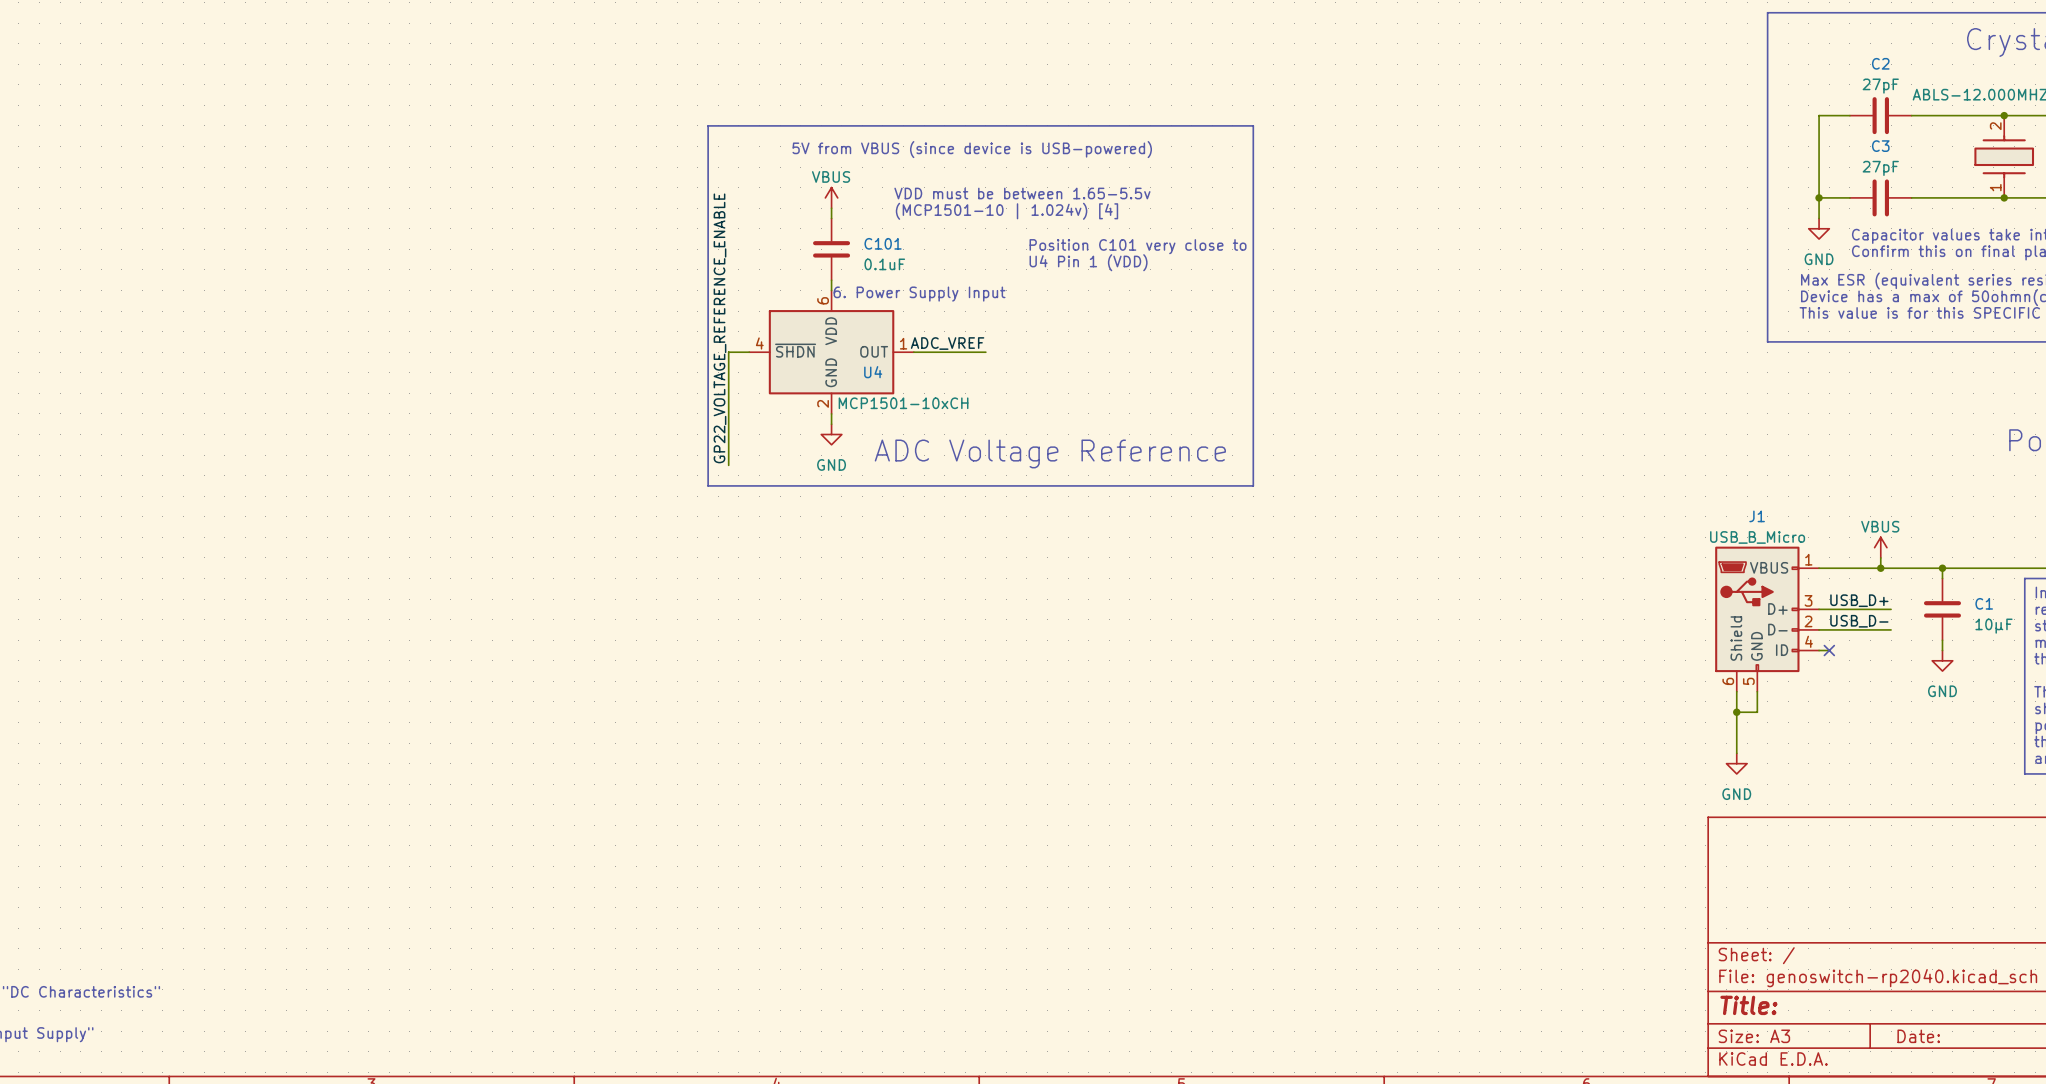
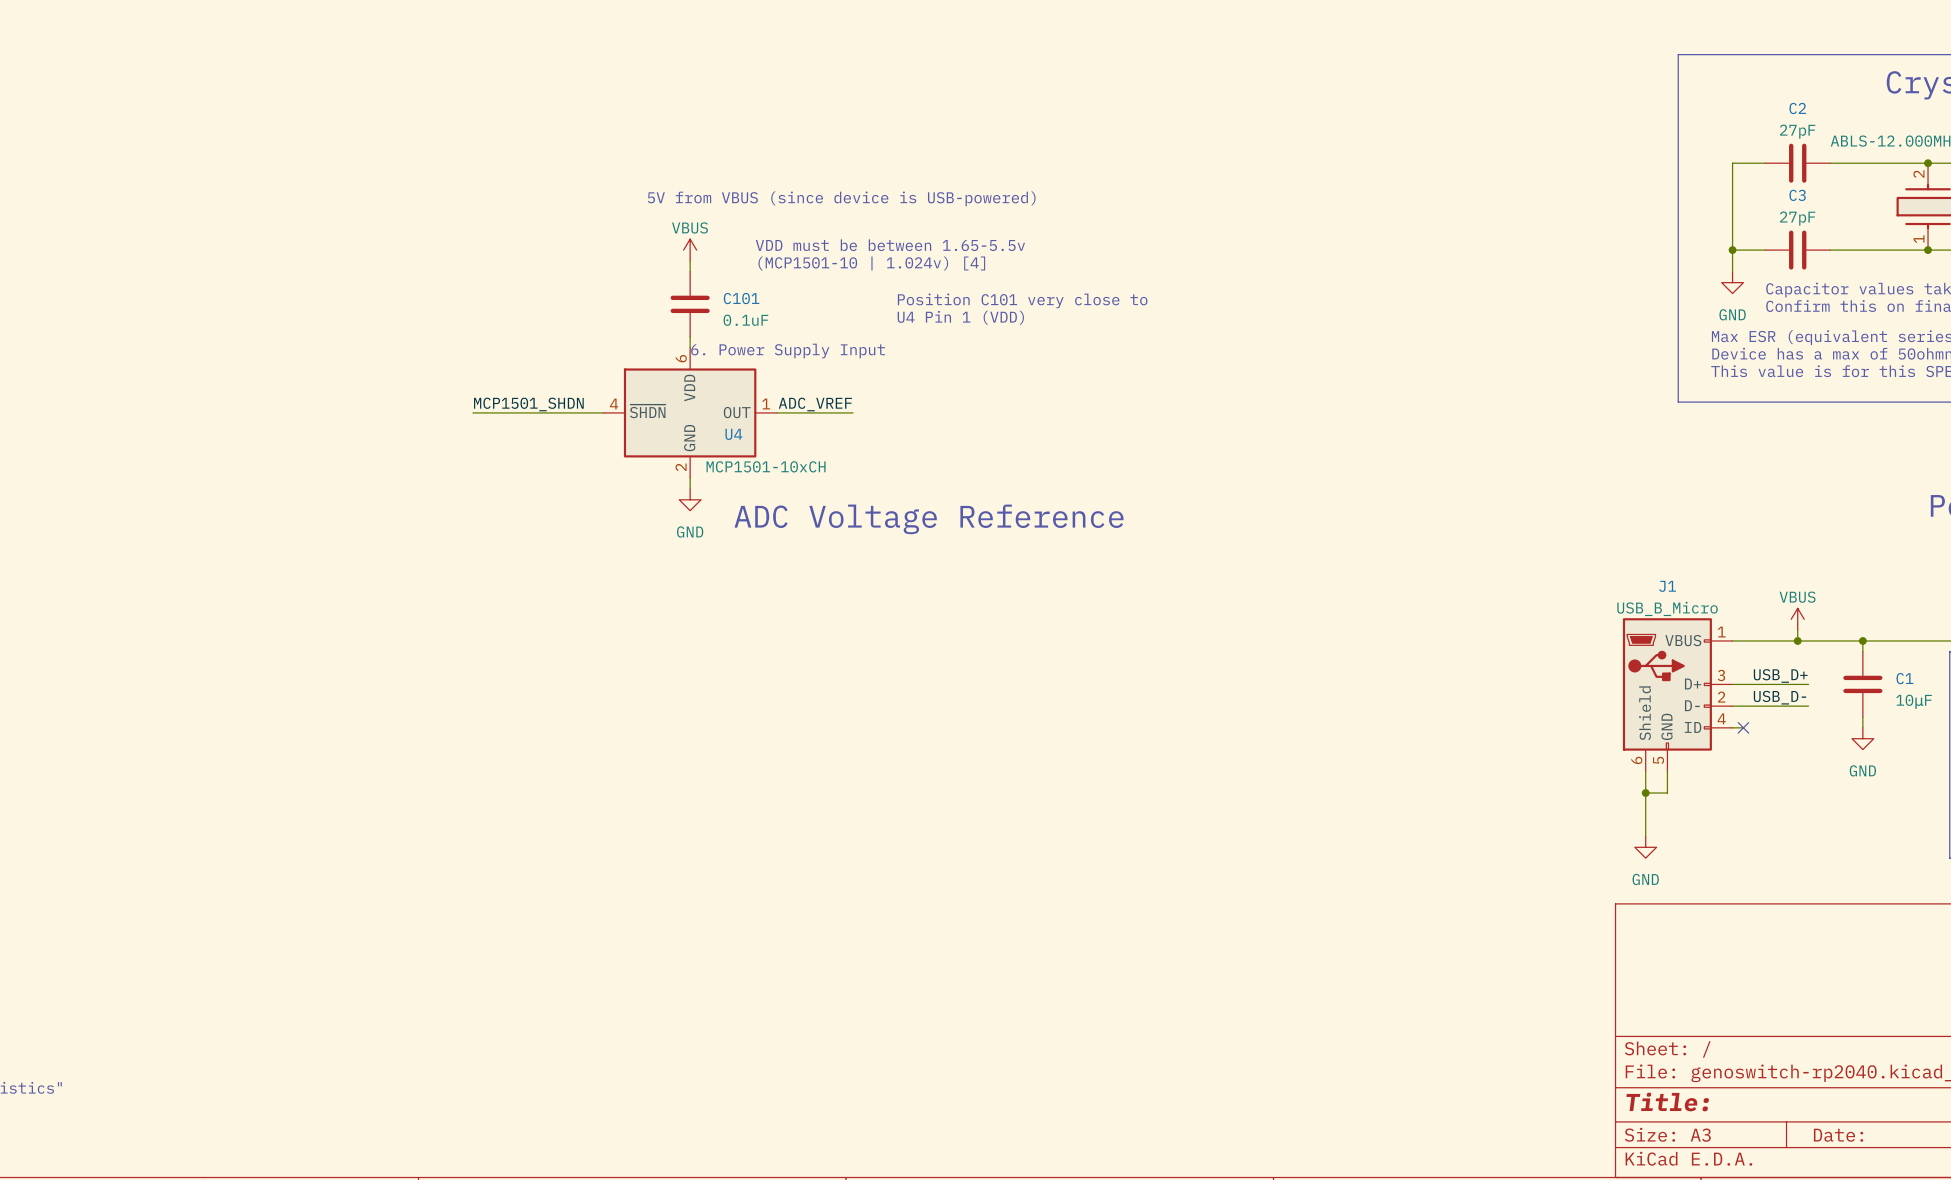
line: (708, 125) (1253, 125) (1253, 485) (708, 485) (708, 125) -> none
label: GP22_VOLTAGE_REFERENCE_ENABLE (720, 328) -> none
label: none -> MCP1501_SHDN (528, 404)
wire: (728, 352) (728, 465) -> (581, 412) (472, 412)

